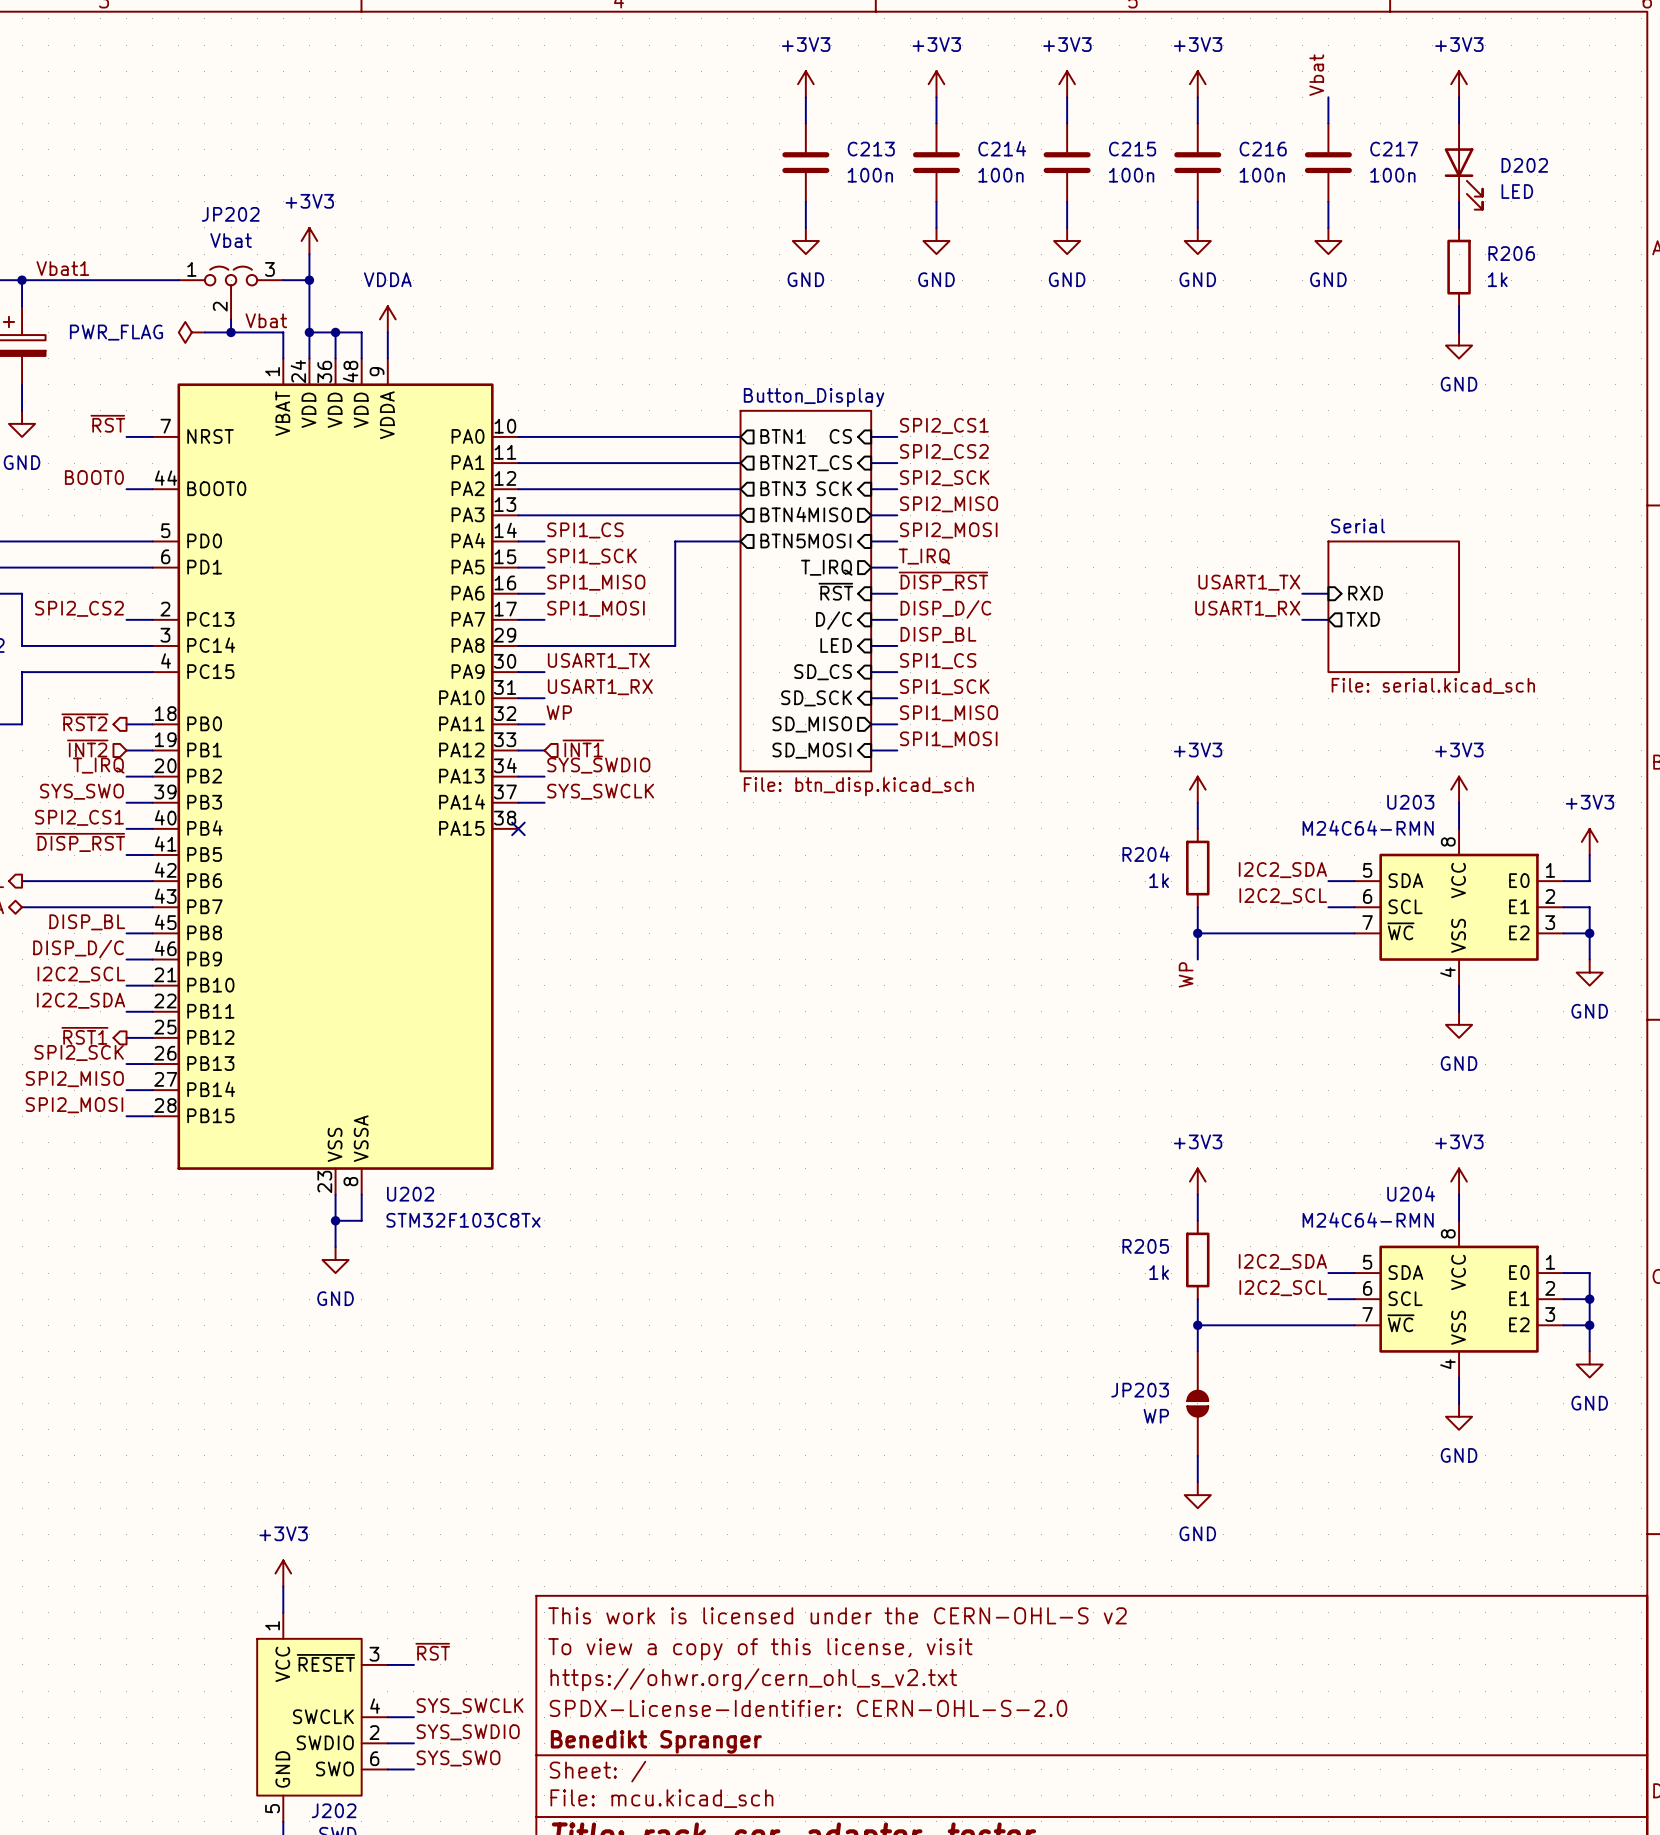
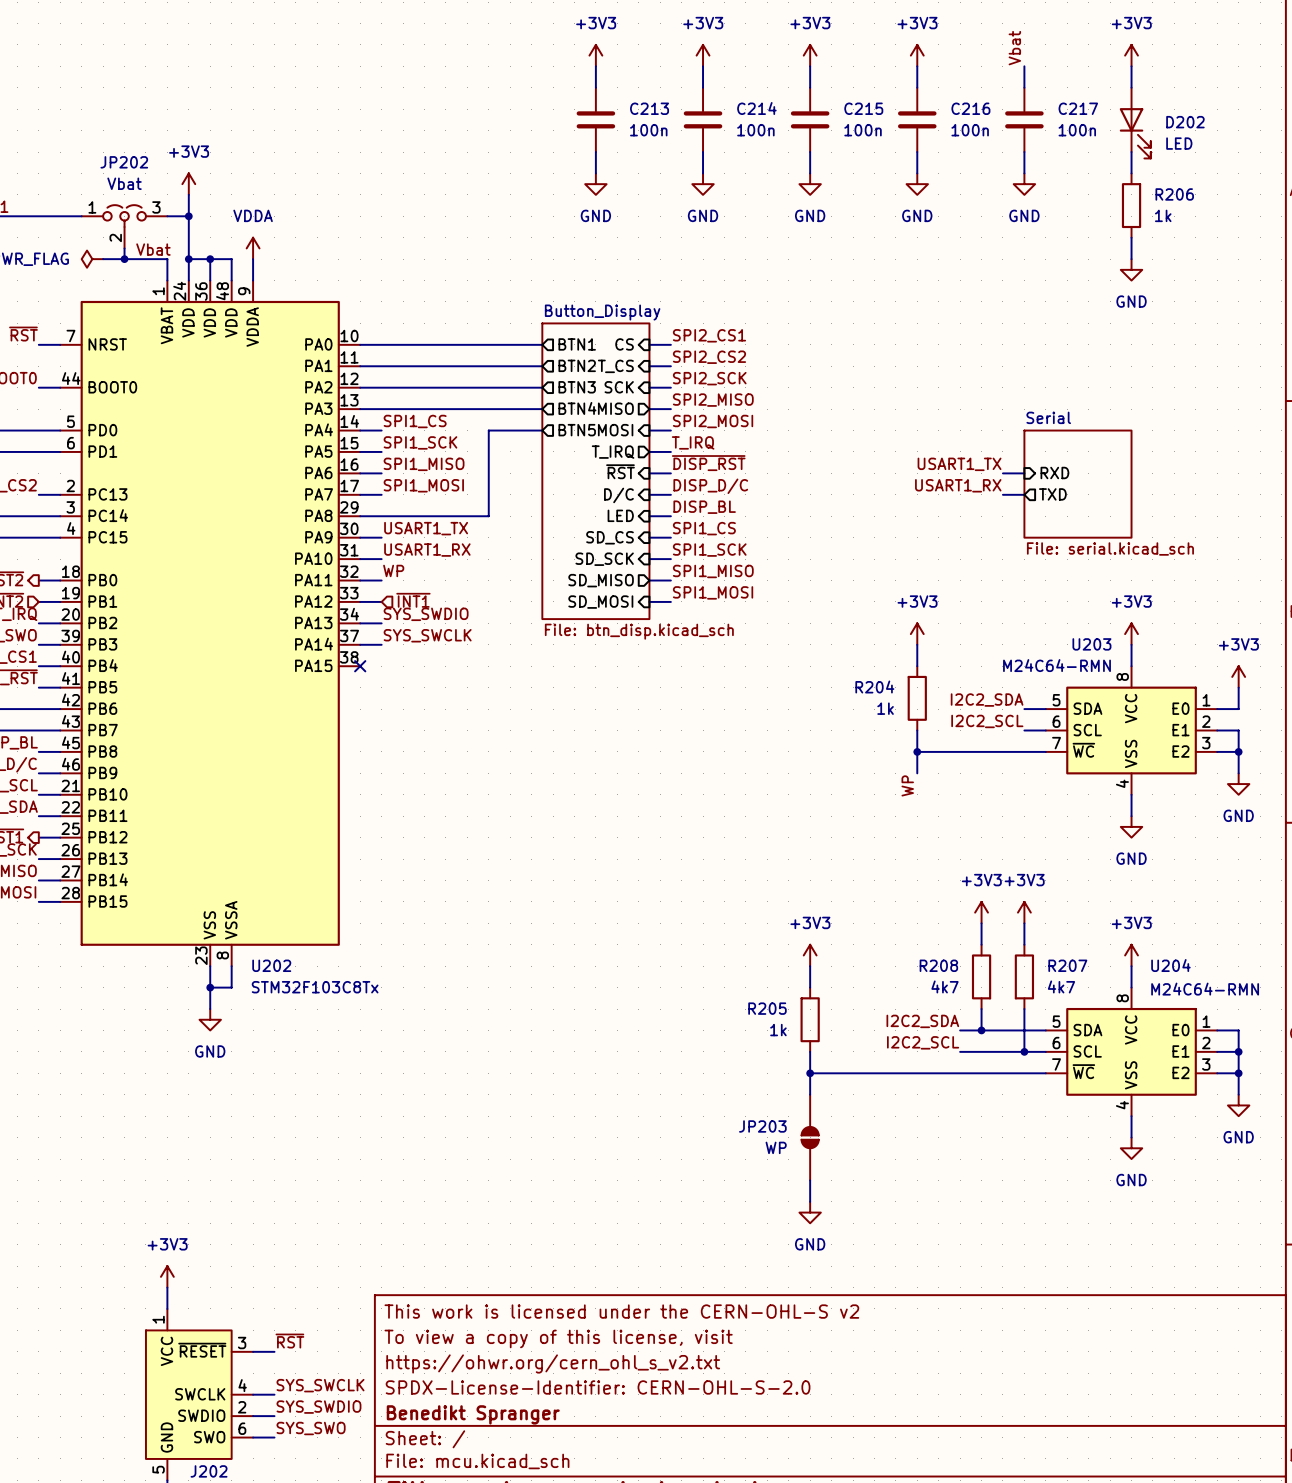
power symbol: none -> +3V3 (981, 912)
power symbol: none -> +3V3 (1024, 912)
wire: none -> (981, 923) (981, 944)
wire: none -> (1024, 923) (1024, 944)
power symbol: none -> +3V3 (810, 955)
power symbol: +3V3 (1197, 1181) -> none
U204 name position: U204 (1411, 1193) -> U204 (1170, 965)
wire: (1197, 1194) (1197, 1220) -> (810, 966) (810, 987)
R208: none -> 4k7 (981, 976)
R207: none -> 4k7 (1024, 976)
U204 value position: M24C64-RMN (1368, 1219) -> M24C64-RMN (1205, 989)
wire: none -> (981, 1009) (981, 1030)
wire: none -> (1024, 1009) (1024, 1051) (960, 1051)
R205 position: (1197, 1259) -> (810, 1019)
label position: I2C2_SDA (1282, 1262) -> I2C2_SDA (922, 1021)
wire: none -> (960, 1030) (1024, 1030)
junction: none -> (981, 1030)
label position: I2C2_SCL (1283, 1288) -> I2C2_SCL (923, 1042)
wire: (1197, 1299) (1197, 1351) -> (810, 1051) (810, 1094)
junction: none -> (1024, 1051)
wire: none -> (810, 1073) (917, 1073)
junction: none -> (810, 1073)
junction: (1197, 1325) -> none
JP203 position: (1197, 1403) -> (810, 1137)
wire: (1197, 1455) (1197, 1482) -> (810, 1180) (810, 1201)
power symbol position: GND (1197, 1495) -> GND (810, 1212)

